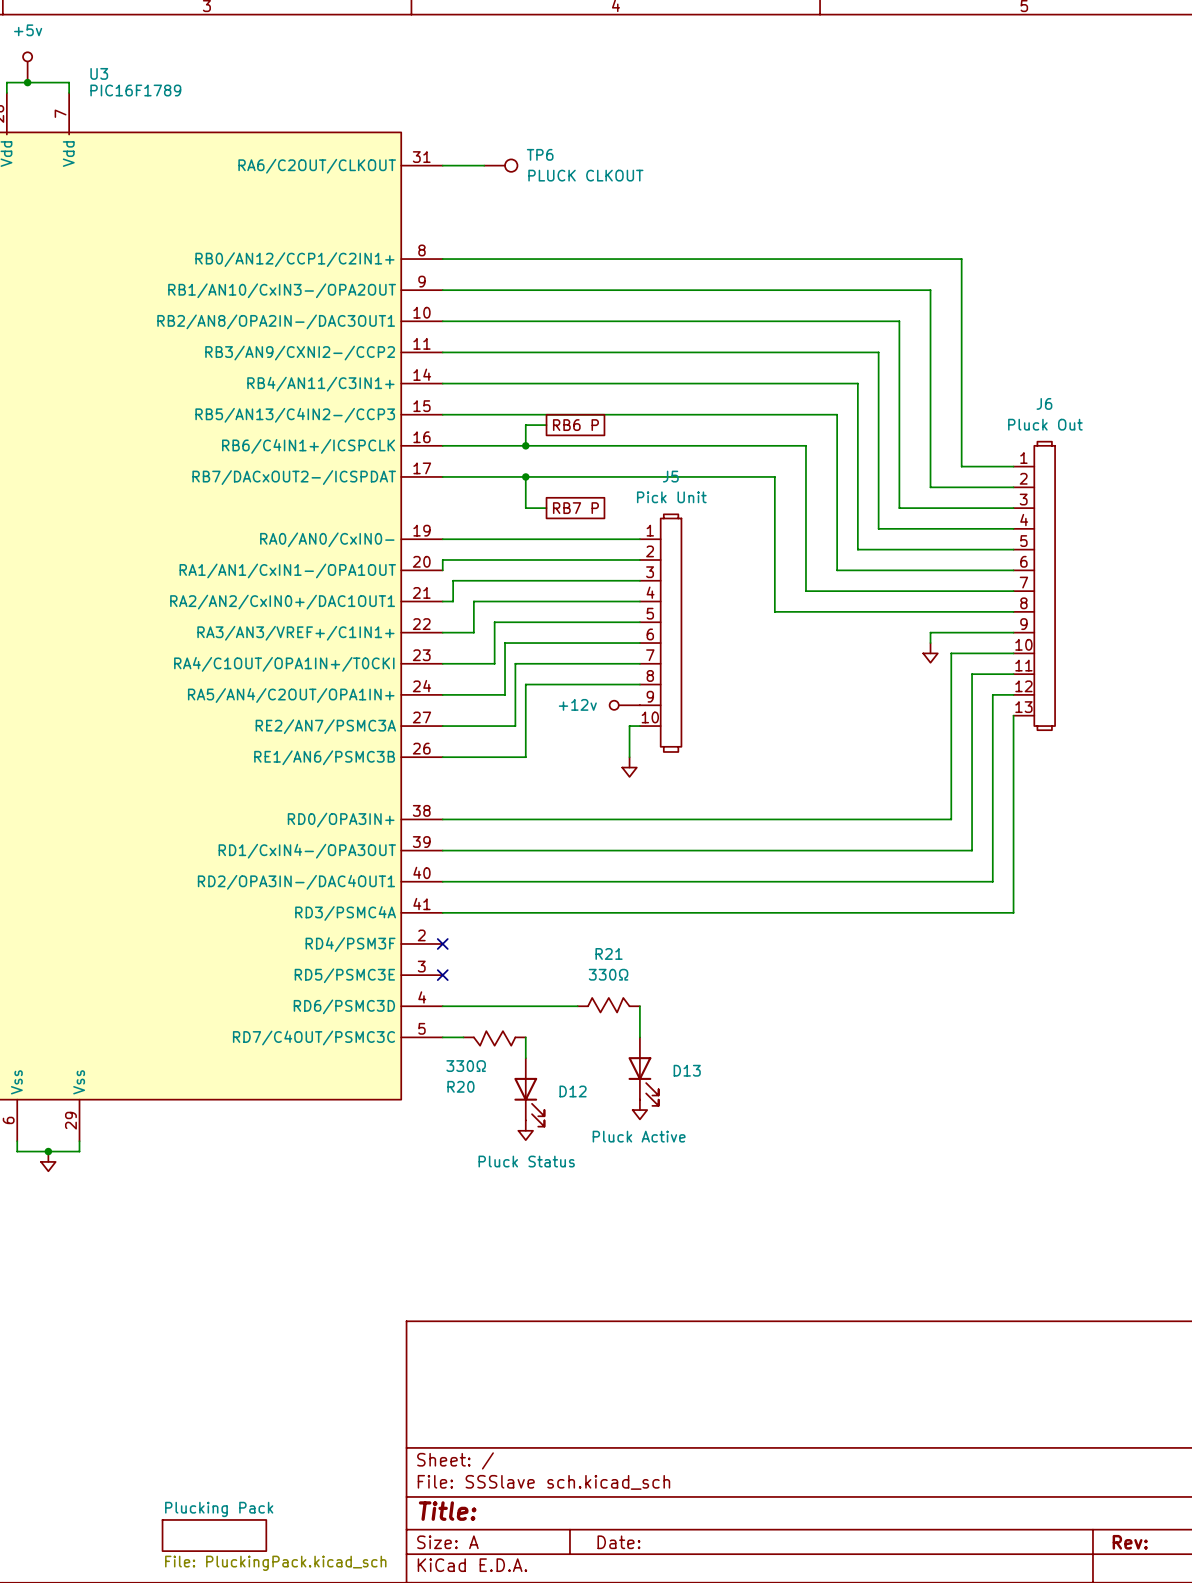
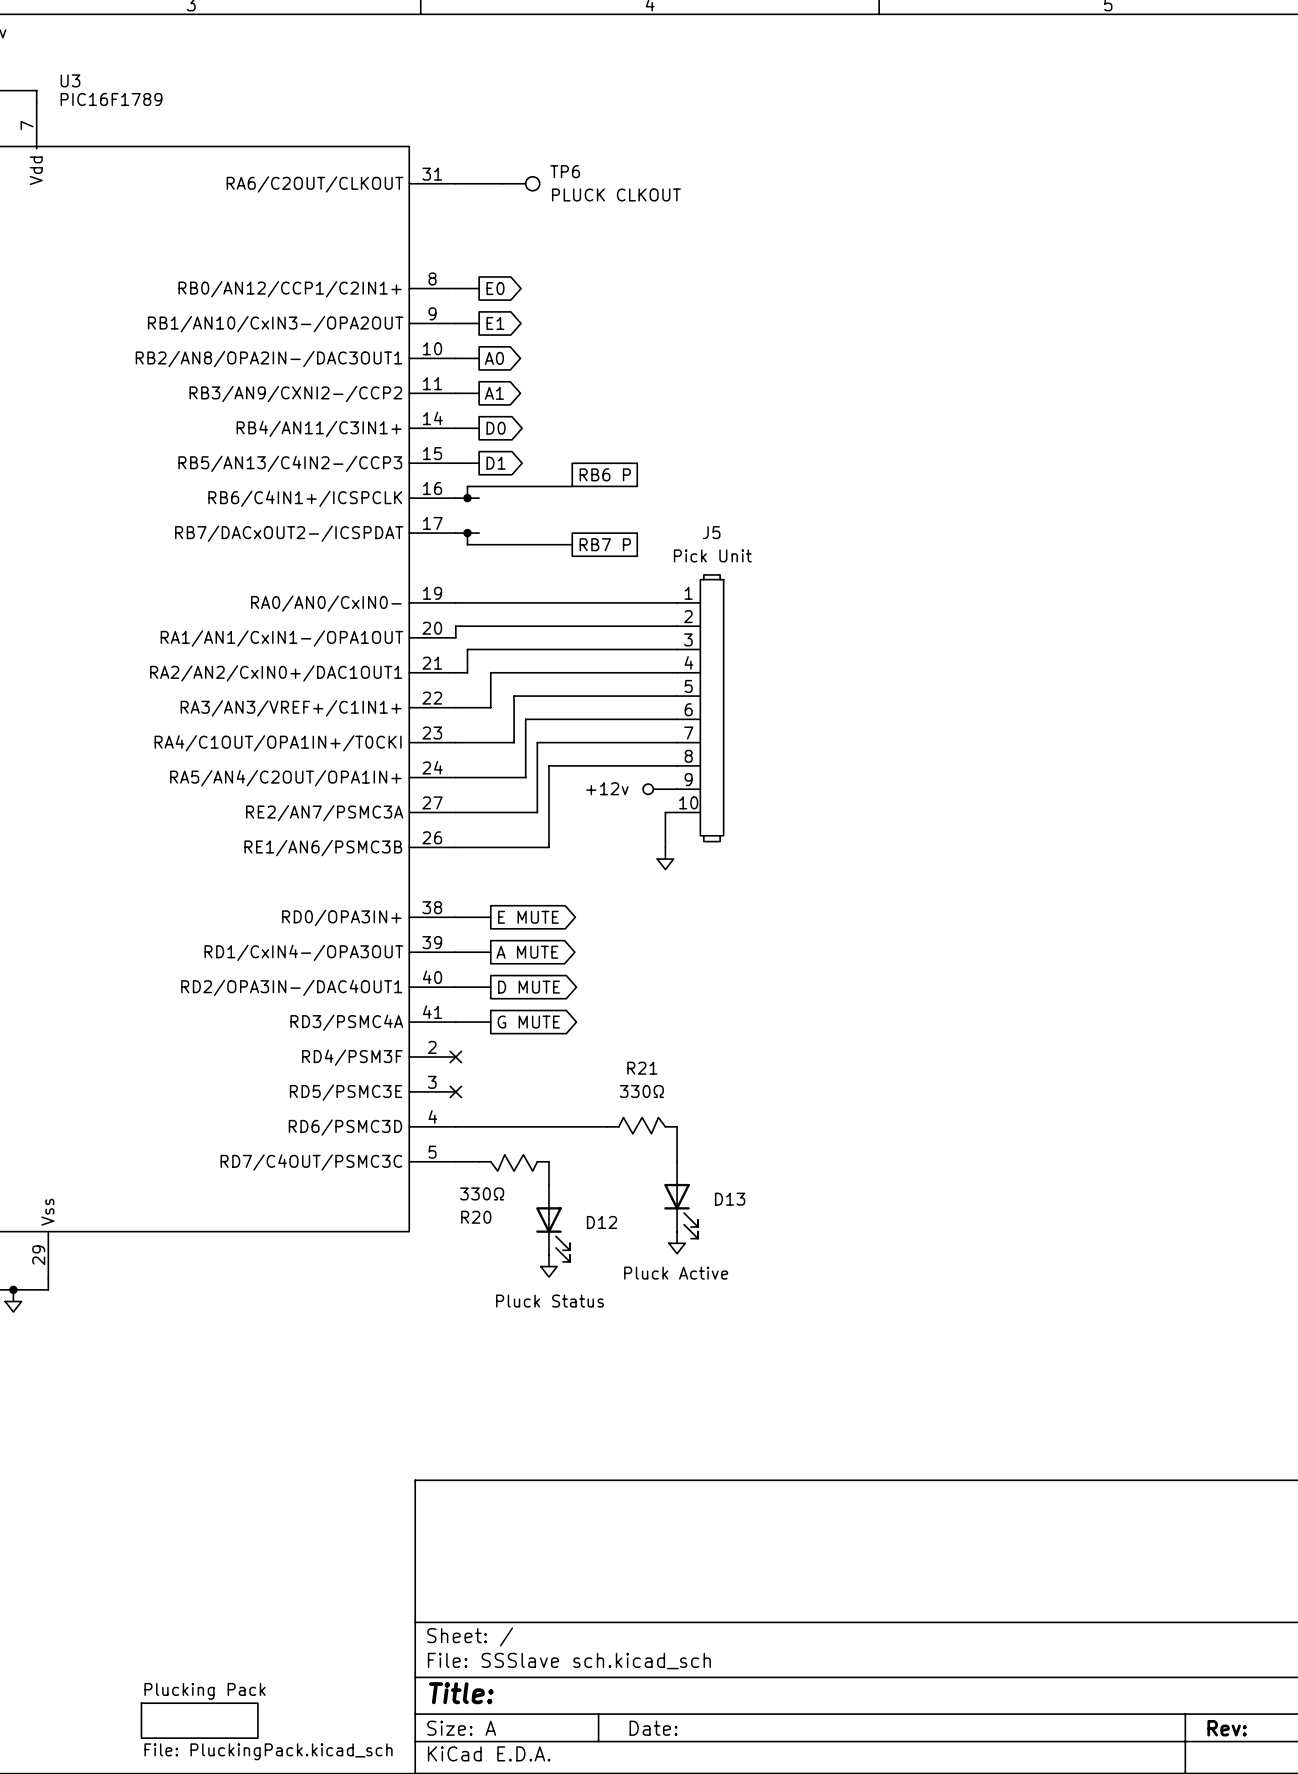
wire: (463, 259) (961, 259) (961, 466) (1013, 466) -> none
global label: none -> E0 (495, 288)
wire: (463, 290) (930, 290) (930, 487) (1013, 487) -> none
global label: none -> E1 (495, 323)
wire: (463, 321) (899, 321) (899, 508) (1013, 508) -> none
global label: none -> A0 (494, 358)
wire: (463, 352) (878, 352) (878, 528) (1013, 528) -> none
global label: none -> A1 (494, 393)
wire: (463, 383) (857, 383) (857, 549) (1013, 549) -> none
global label: none -> D0 (496, 428)
wire: (463, 414) (837, 414) (837, 570) (1013, 570) -> none
global label: none -> D1 (496, 463)
wire: (546, 425) (525, 425) (525, 445) -> none
wire: none -> (572, 486) (467, 486) (467, 498)
junction: none -> (467, 498)
wire: (463, 445) (805, 445) (805, 591) (1013, 591) -> none
junction: (525, 445) -> none
wire: none -> (467, 533) (467, 544) (572, 544)
junction: none -> (467, 533)
wire: (463, 476) (774, 476) (774, 611) (1013, 611) -> none
wire: (525, 476) (525, 508) (546, 508) -> none
junction: (525, 476) -> none
global label position: RB7 P (575, 508) -> RB7 P (605, 544)
J6: Pluck Out (1034, 585) -> none
wire: (1013, 632) (930, 632) (930, 643) -> none
power symbol: (930, 652) -> none
wire: (1013, 653) (951, 653) (951, 819) (473, 819) -> none
wire: (1013, 674) (972, 674) (972, 850) (473, 850) -> none
wire: (1013, 694) (992, 694) (992, 881) (473, 881) -> none
wire: (1013, 715) (1013, 912) (473, 912) -> none
global label: none -> E MUTE (528, 917)
global label: none -> A MUTE (527, 952)
global label: none -> D MUTE (529, 987)
global label: none -> G MUTE (528, 1022)

